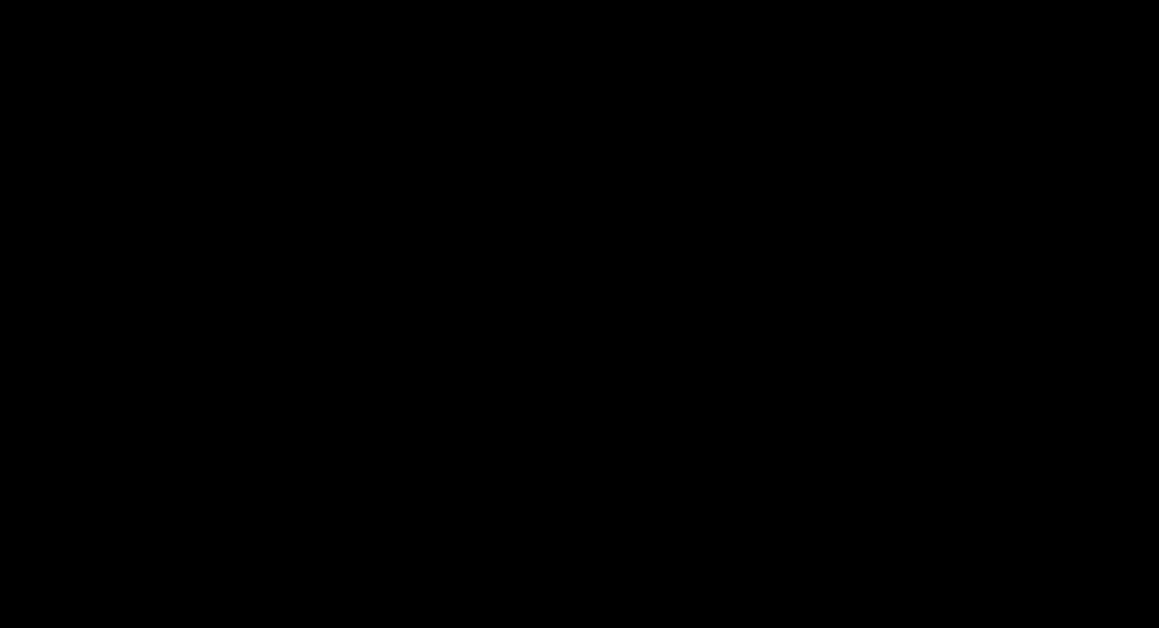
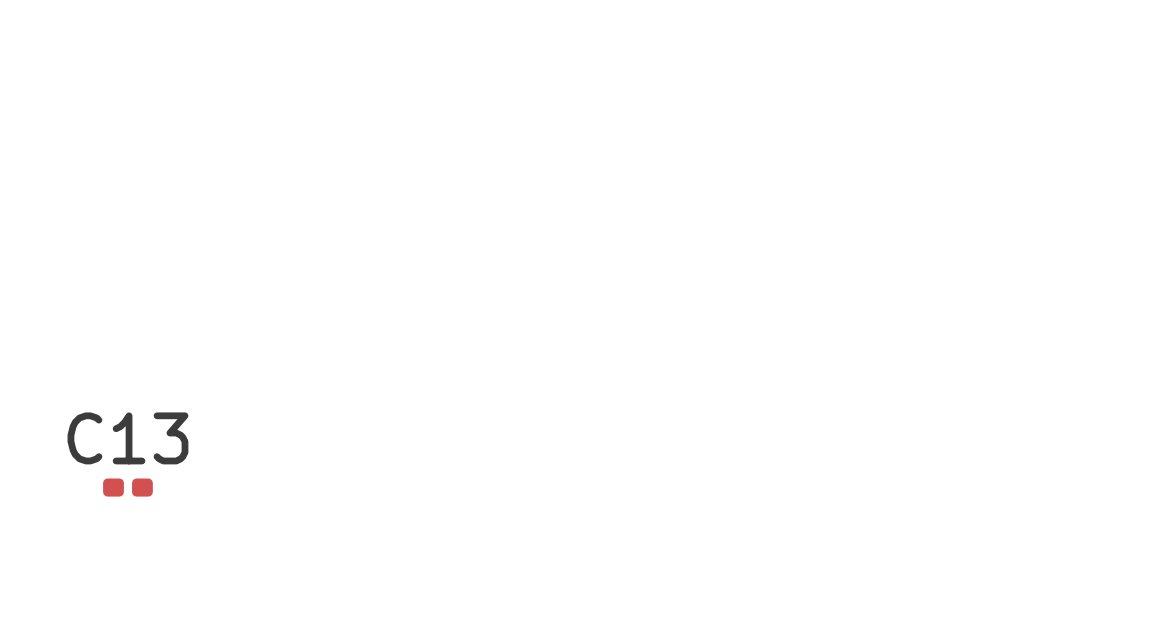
C13: none -> (127, 487)

